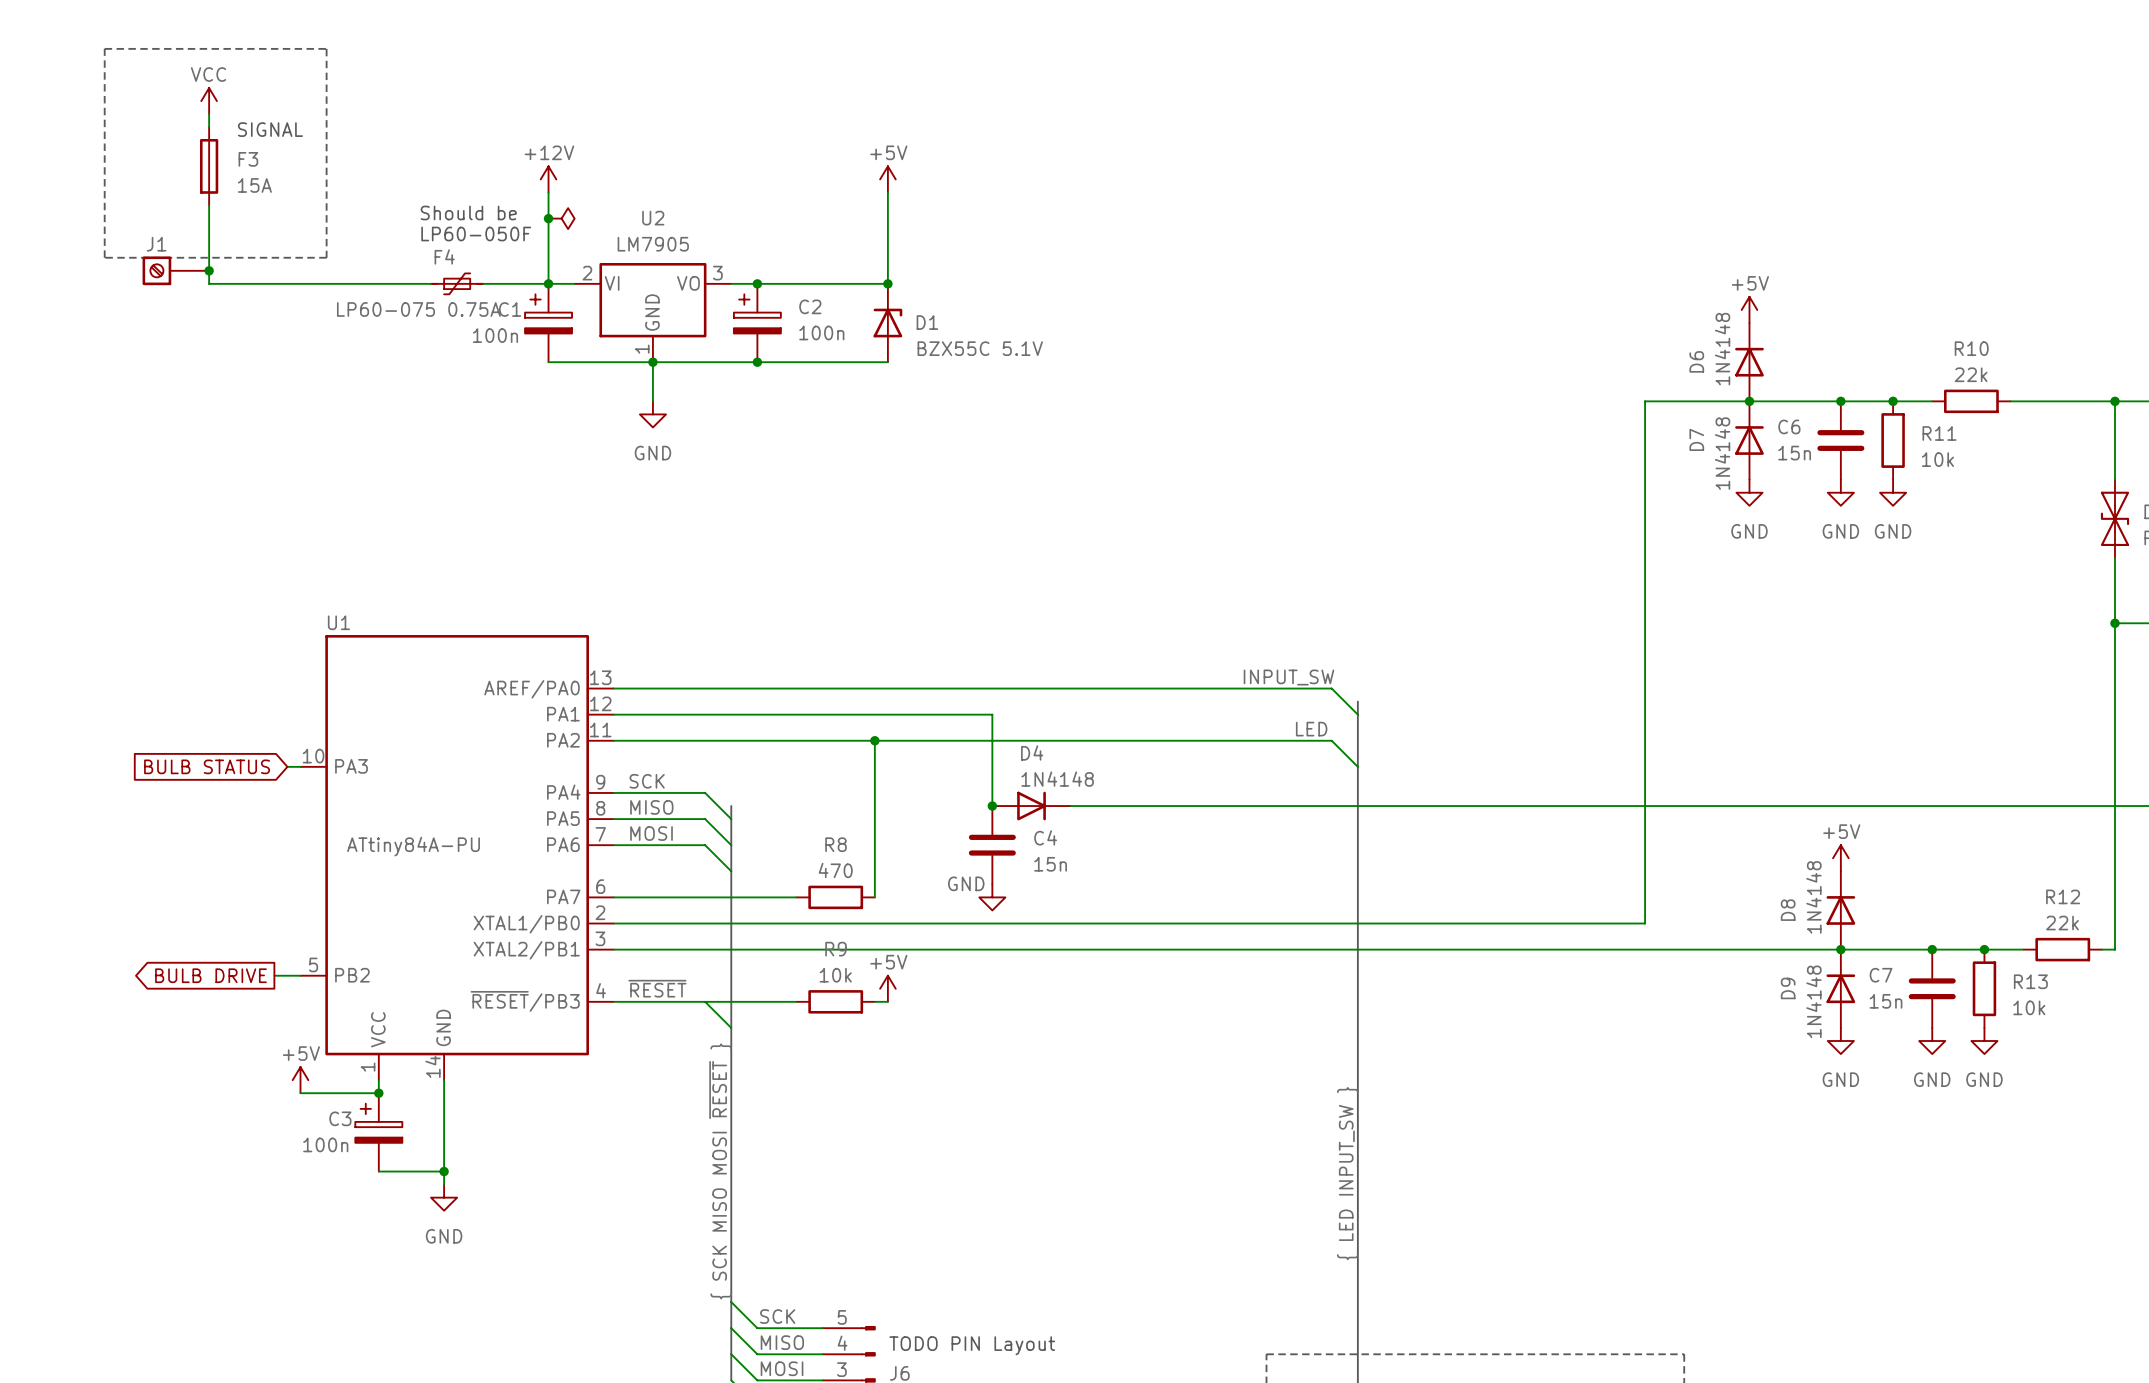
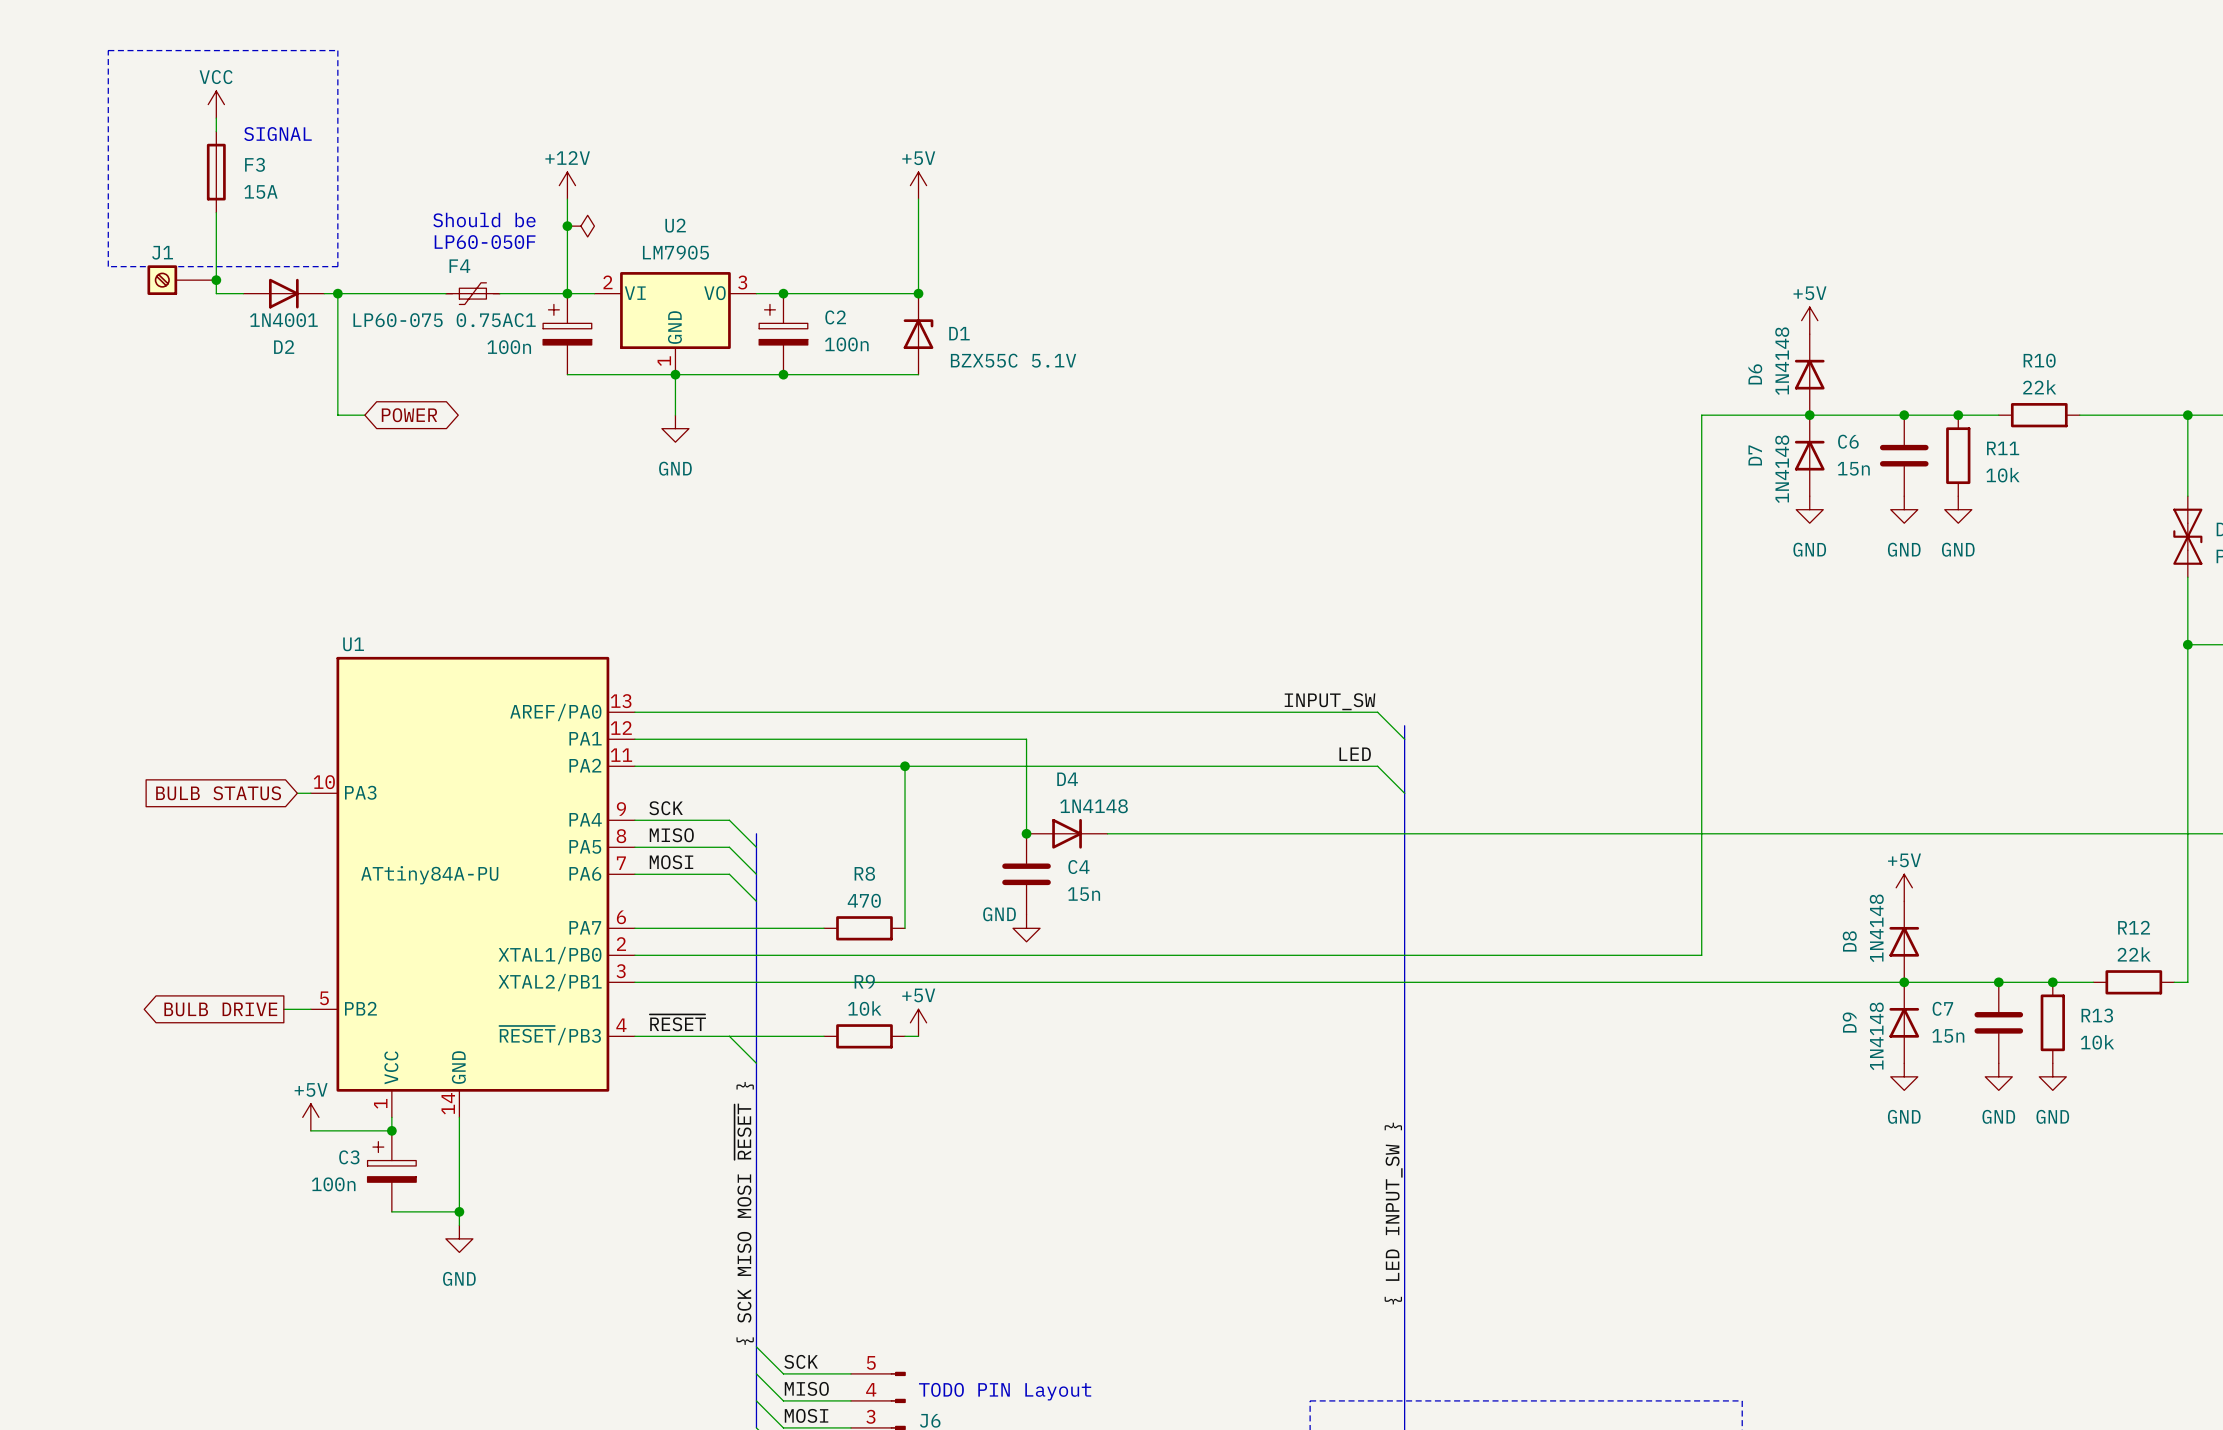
D2: none -> 1N4001 (283, 293)
wire: none -> (337, 293) (337, 415) (364, 415)
junction: none -> (337, 293)
global label: none -> POWER (409, 415)

